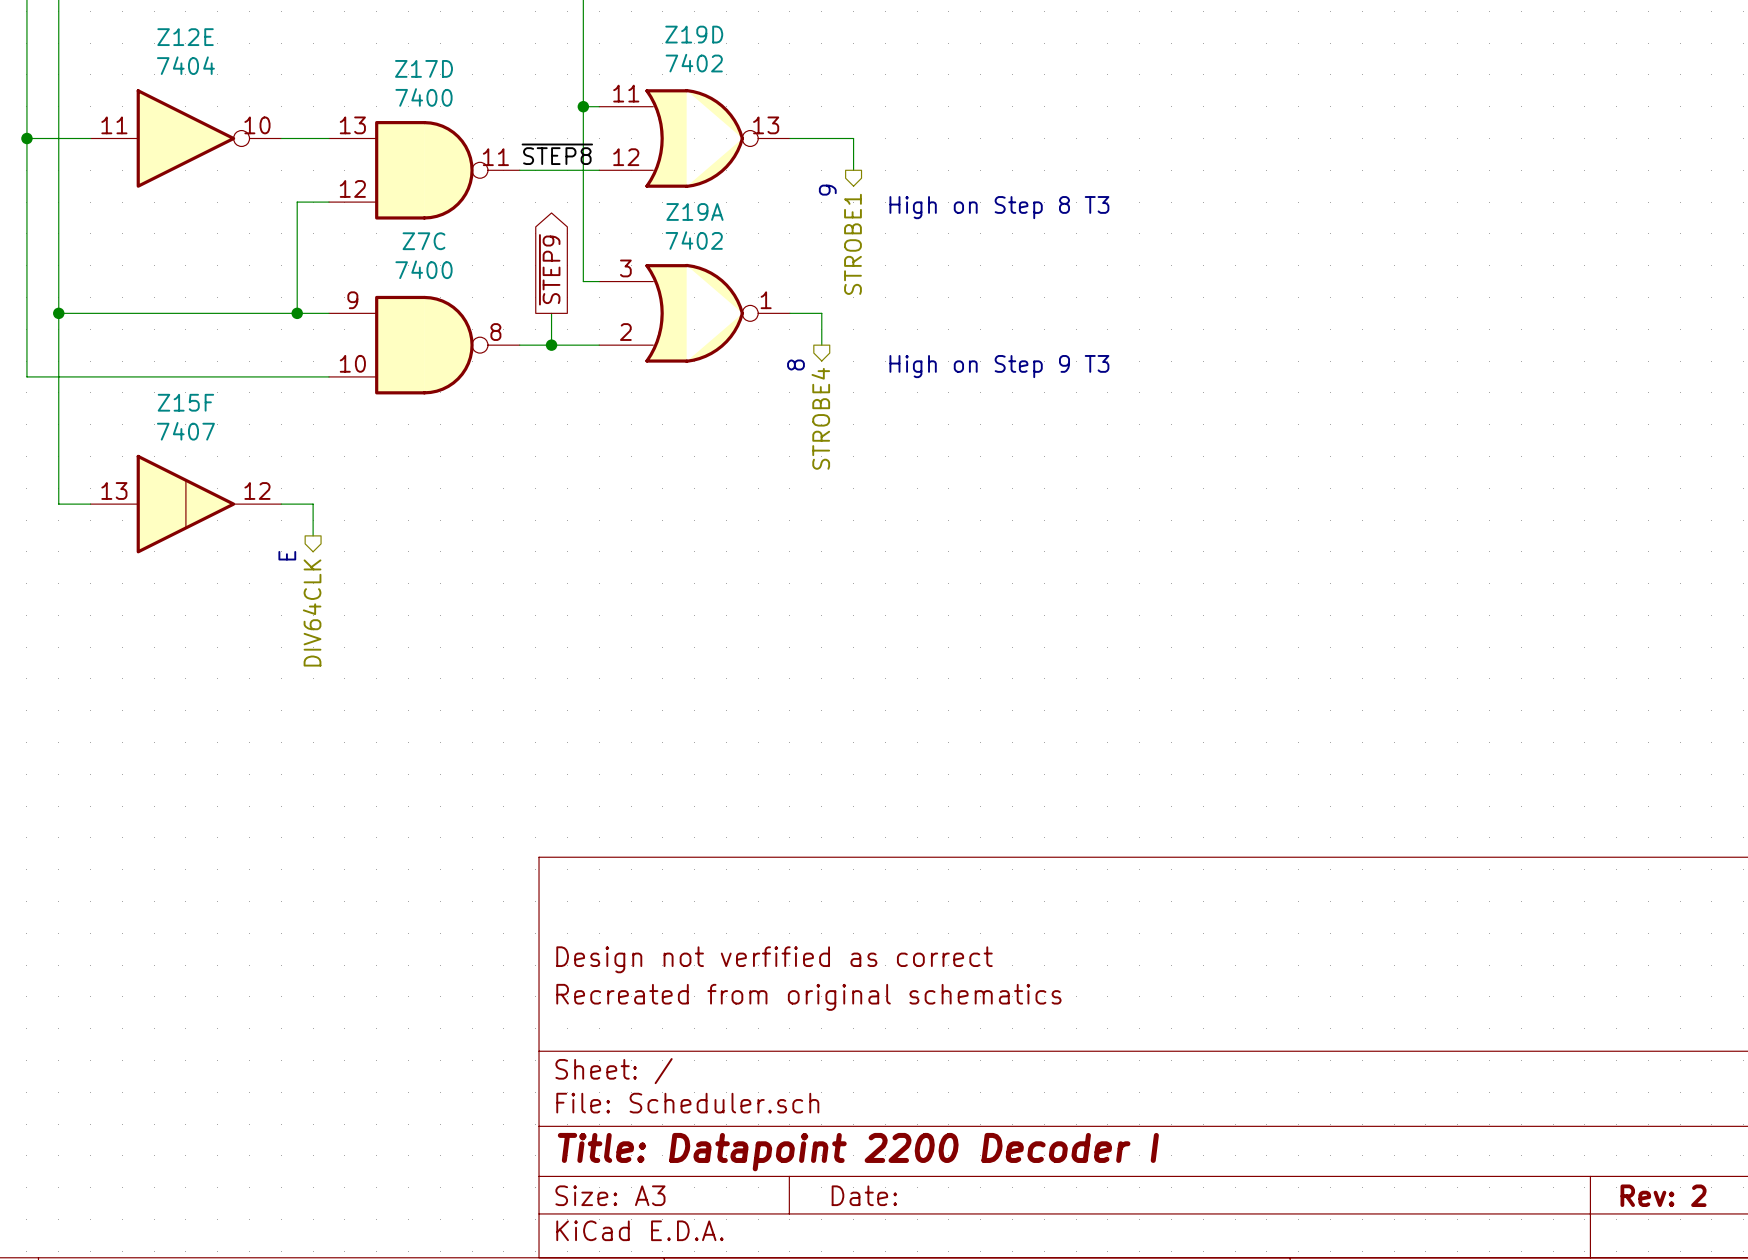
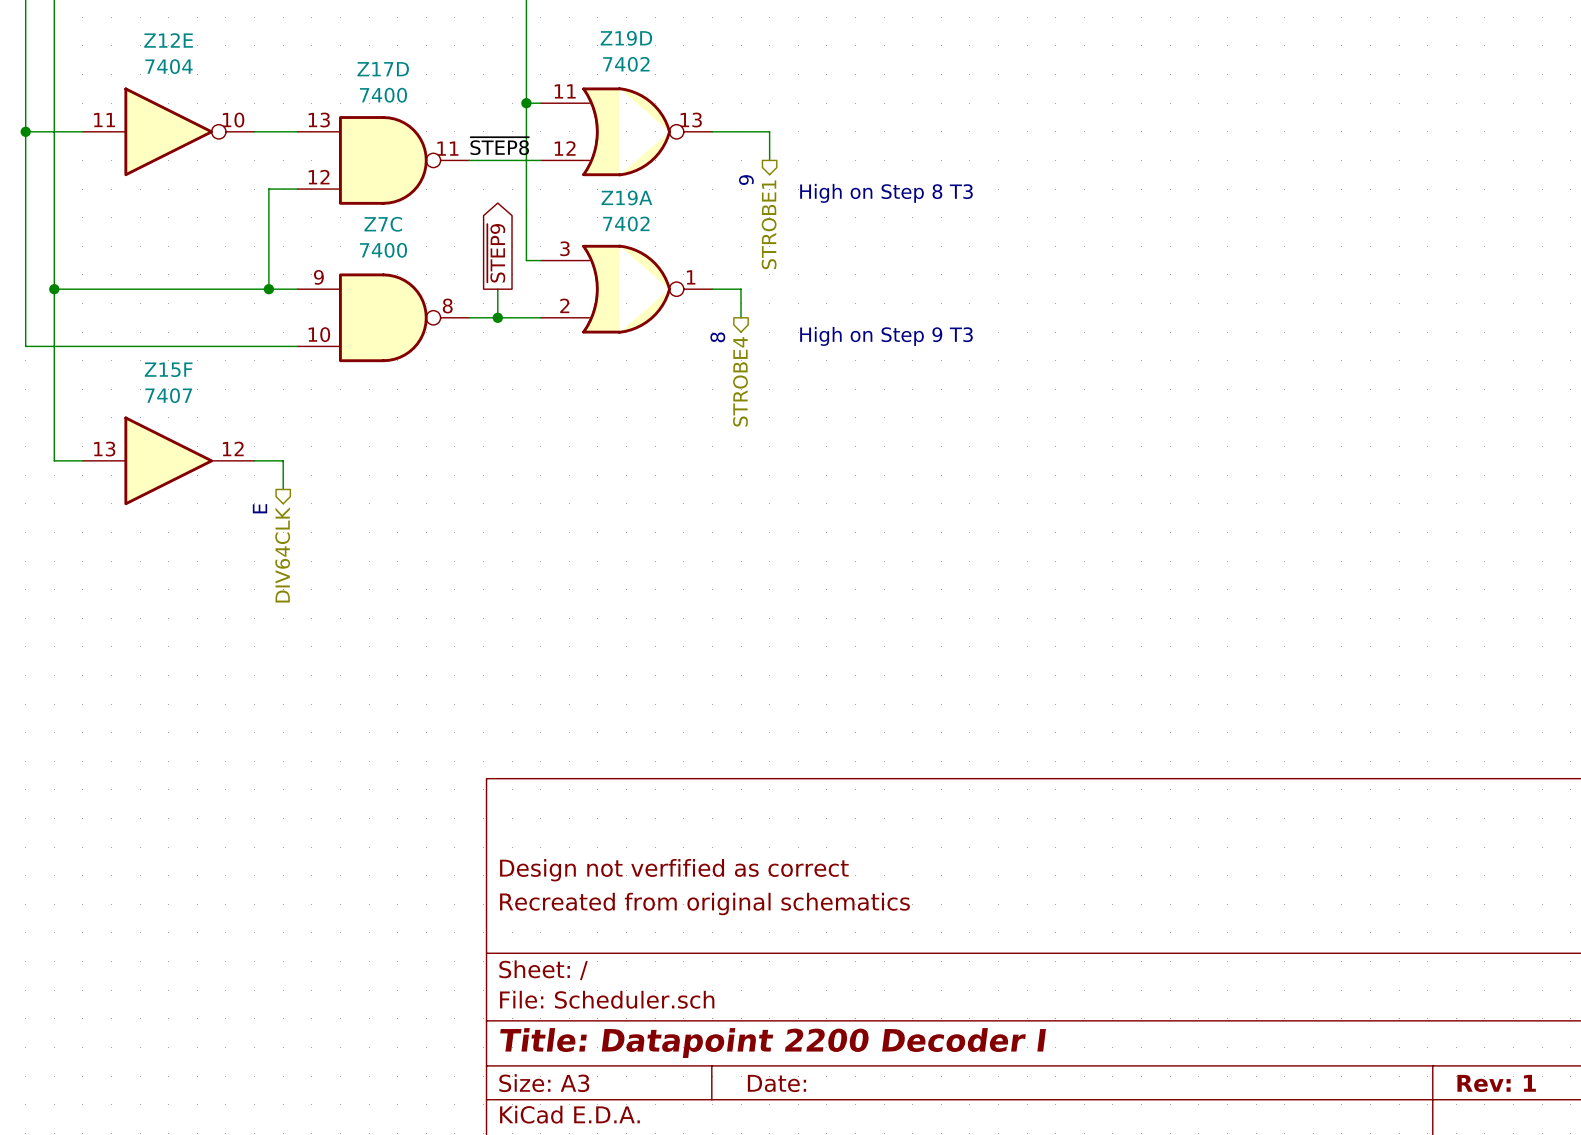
Z15F symbol: [90, 454, 282, 554] -> [82, 416, 255, 506]
title block: Rev: 2 (1663, 1195) -> Rev: 1 (1496, 1083)

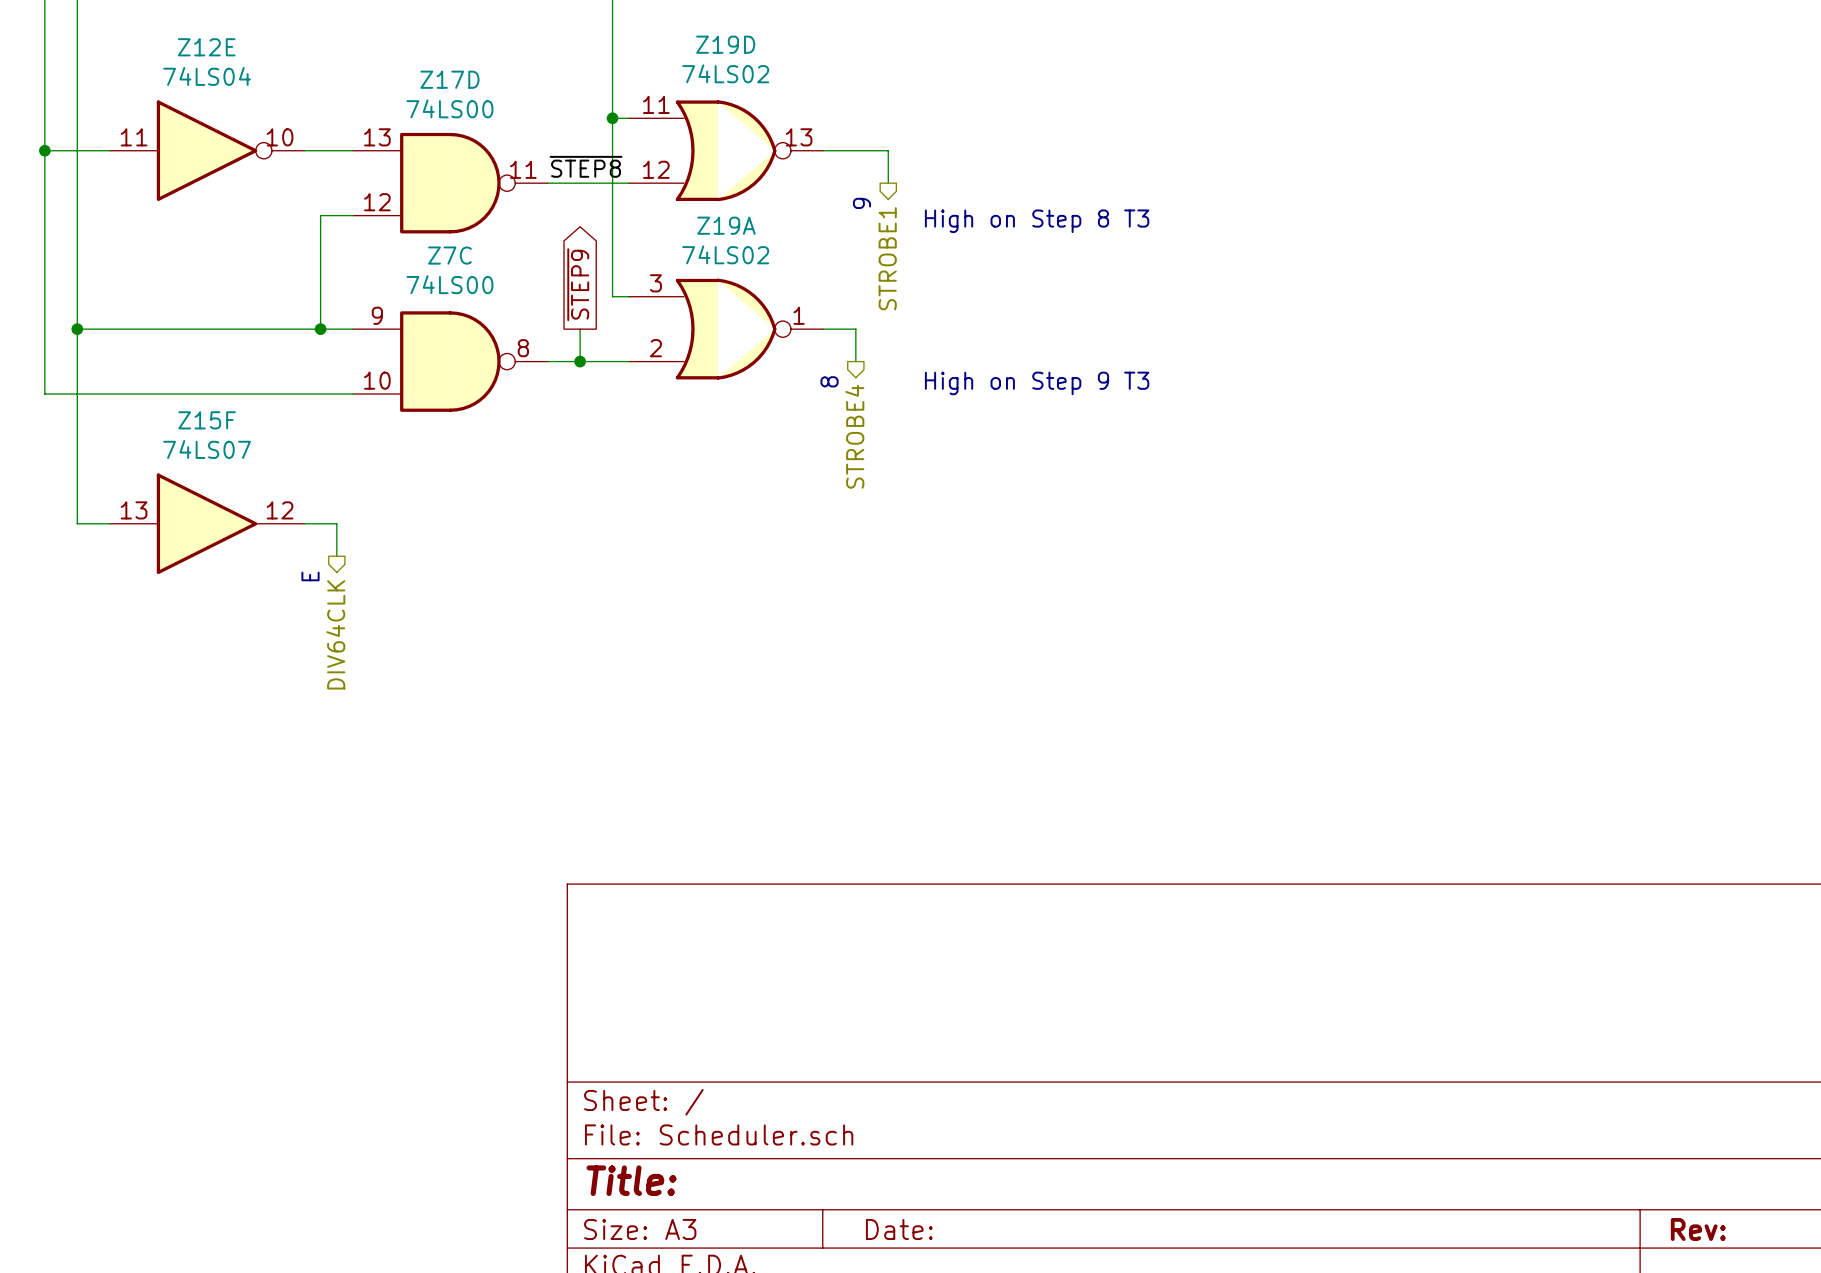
Z19D value: 7402 (626, 64) -> 74LS02 (725, 73)
Z12E value: 7404 (169, 66) -> 74LS04 (207, 76)
Z17D value: 7400 (383, 95) -> 74LS00 (449, 108)
Z19A value: 7402 (626, 223) -> 74LS02 (725, 254)
Z7C value: 7400 (383, 250) -> 74LS00 (449, 284)
Z15F value: 7407 (168, 395) -> 74LS07 (207, 449)
title block: Design not verfified as correct (674, 870) -> none
title block: Recreated from original schematics (704, 904) -> none
title block: Title: Datapoint 2200 Decoder I (773, 1043) -> Title: (631, 1180)
title block: Rev: 1 (1496, 1083) -> Rev: (1698, 1229)

